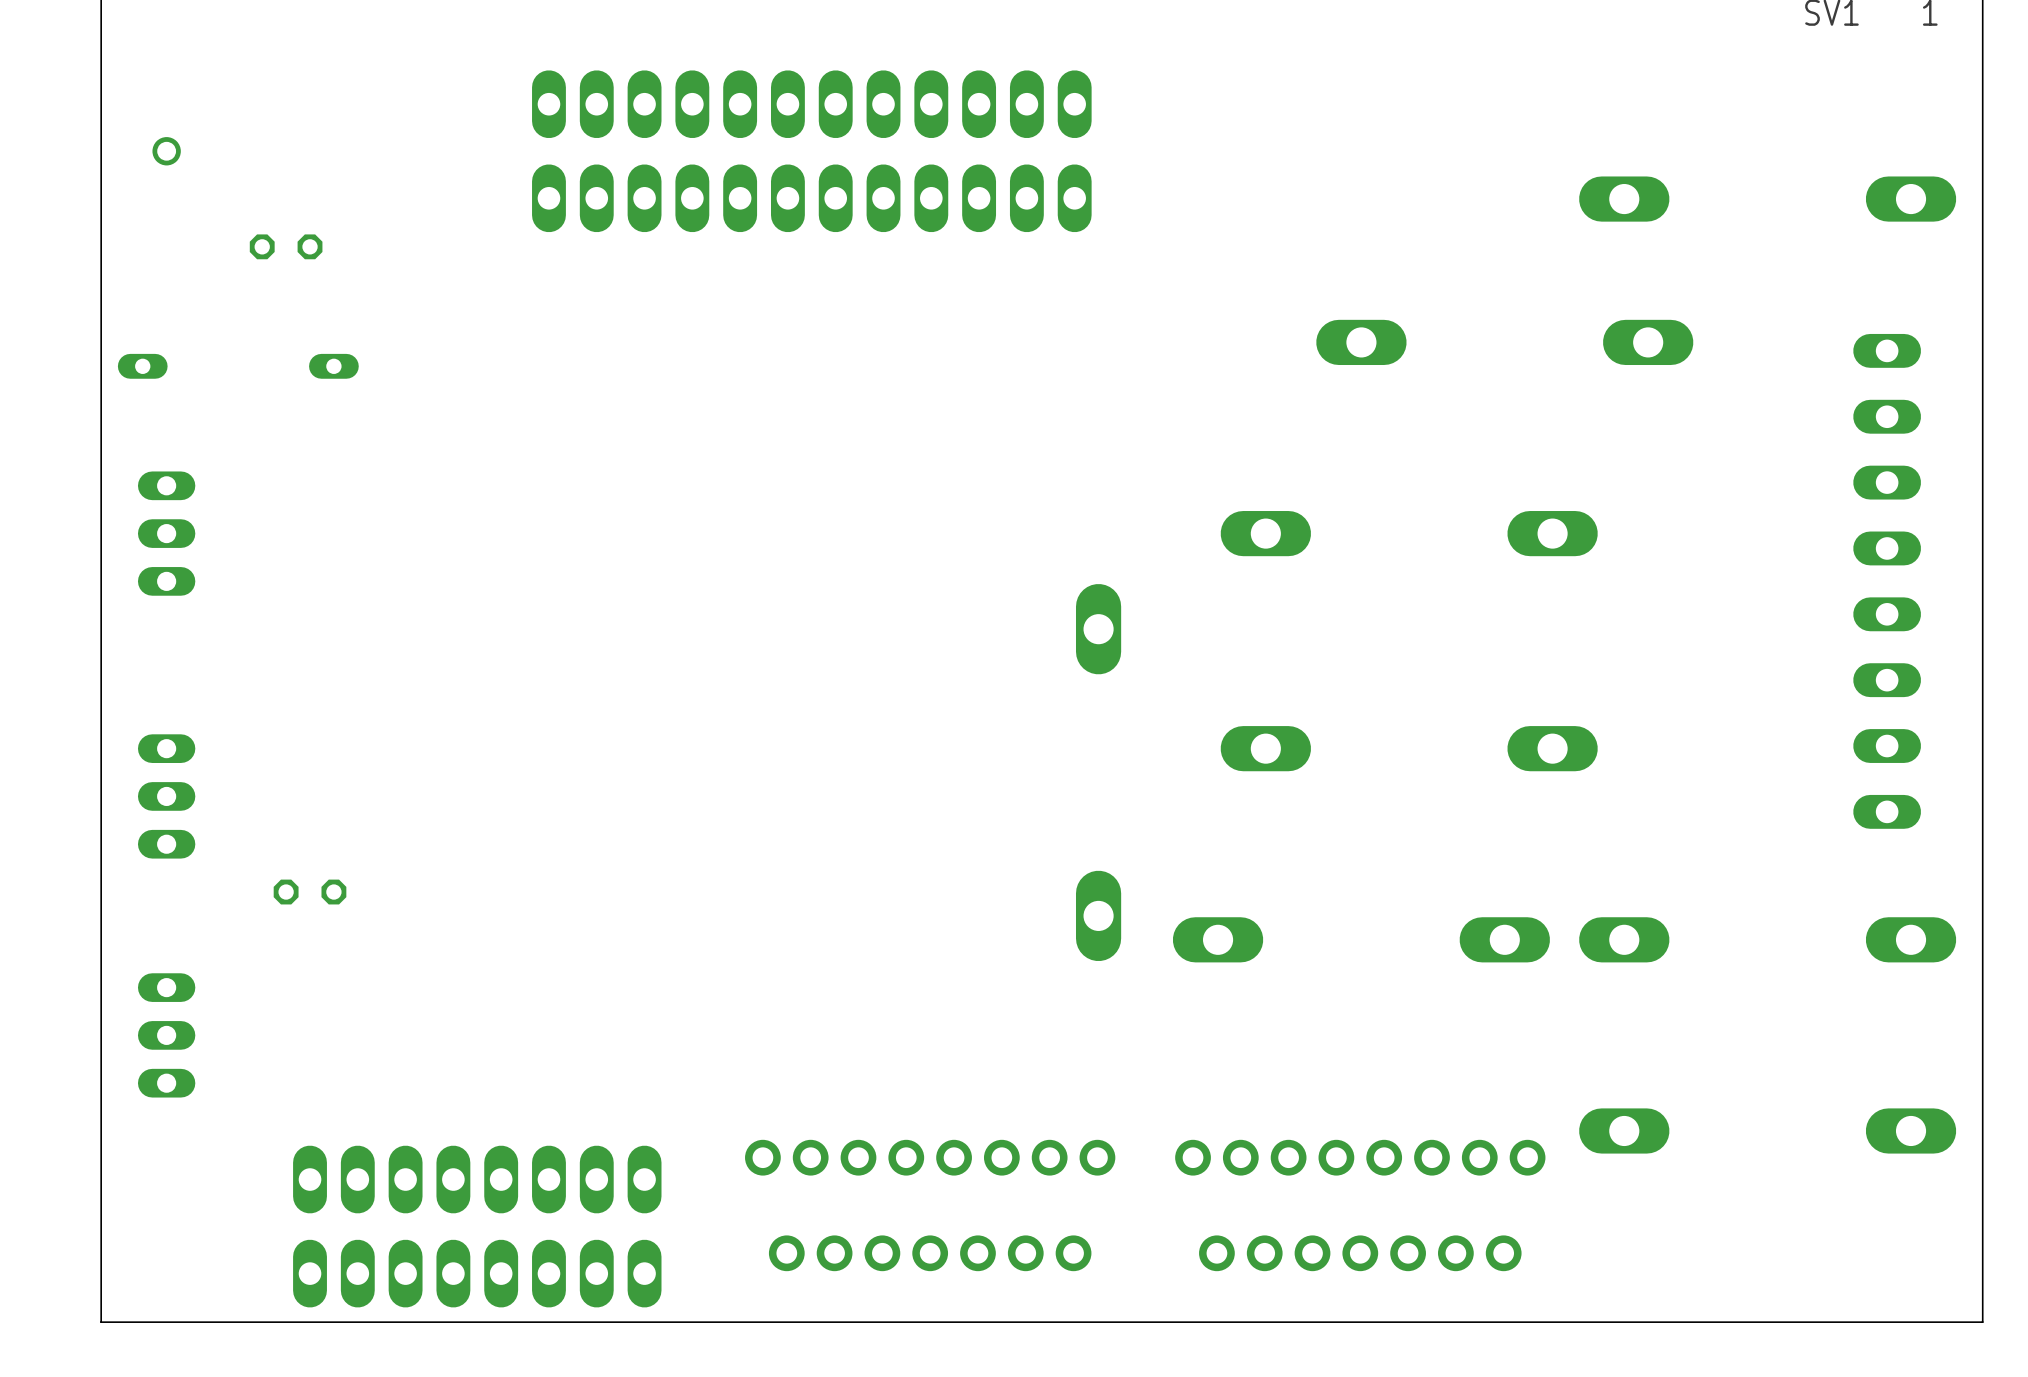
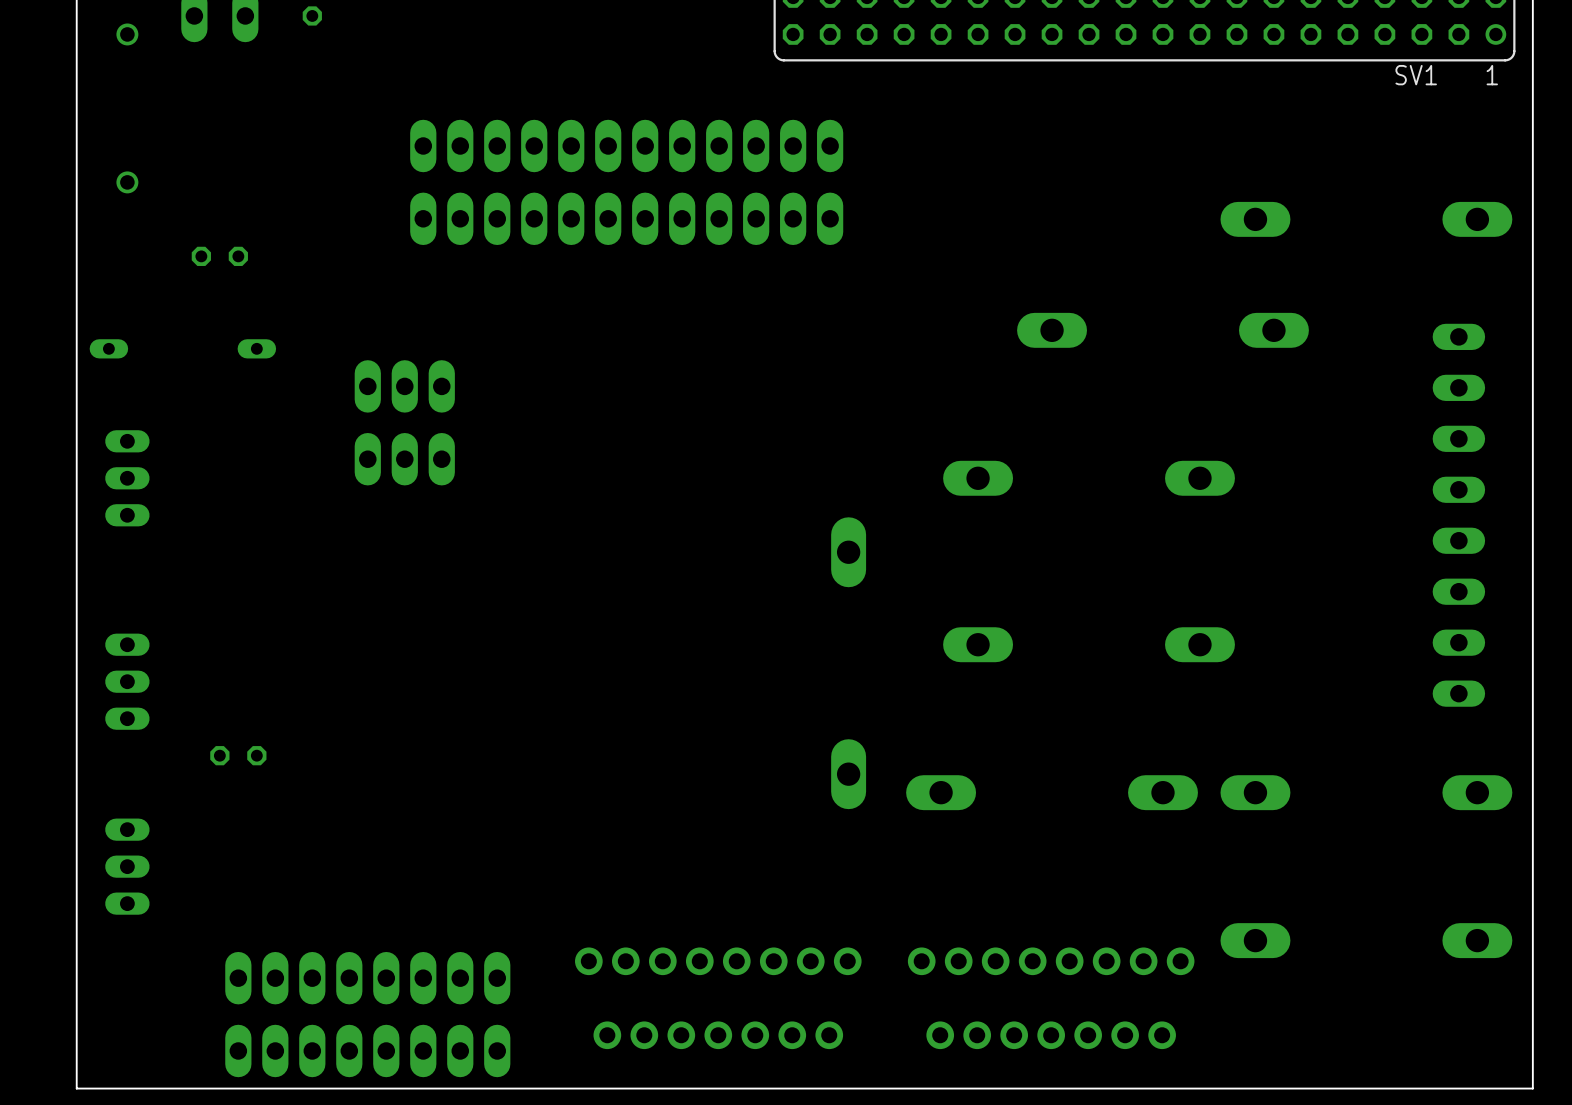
part: none -> (404, 422)

